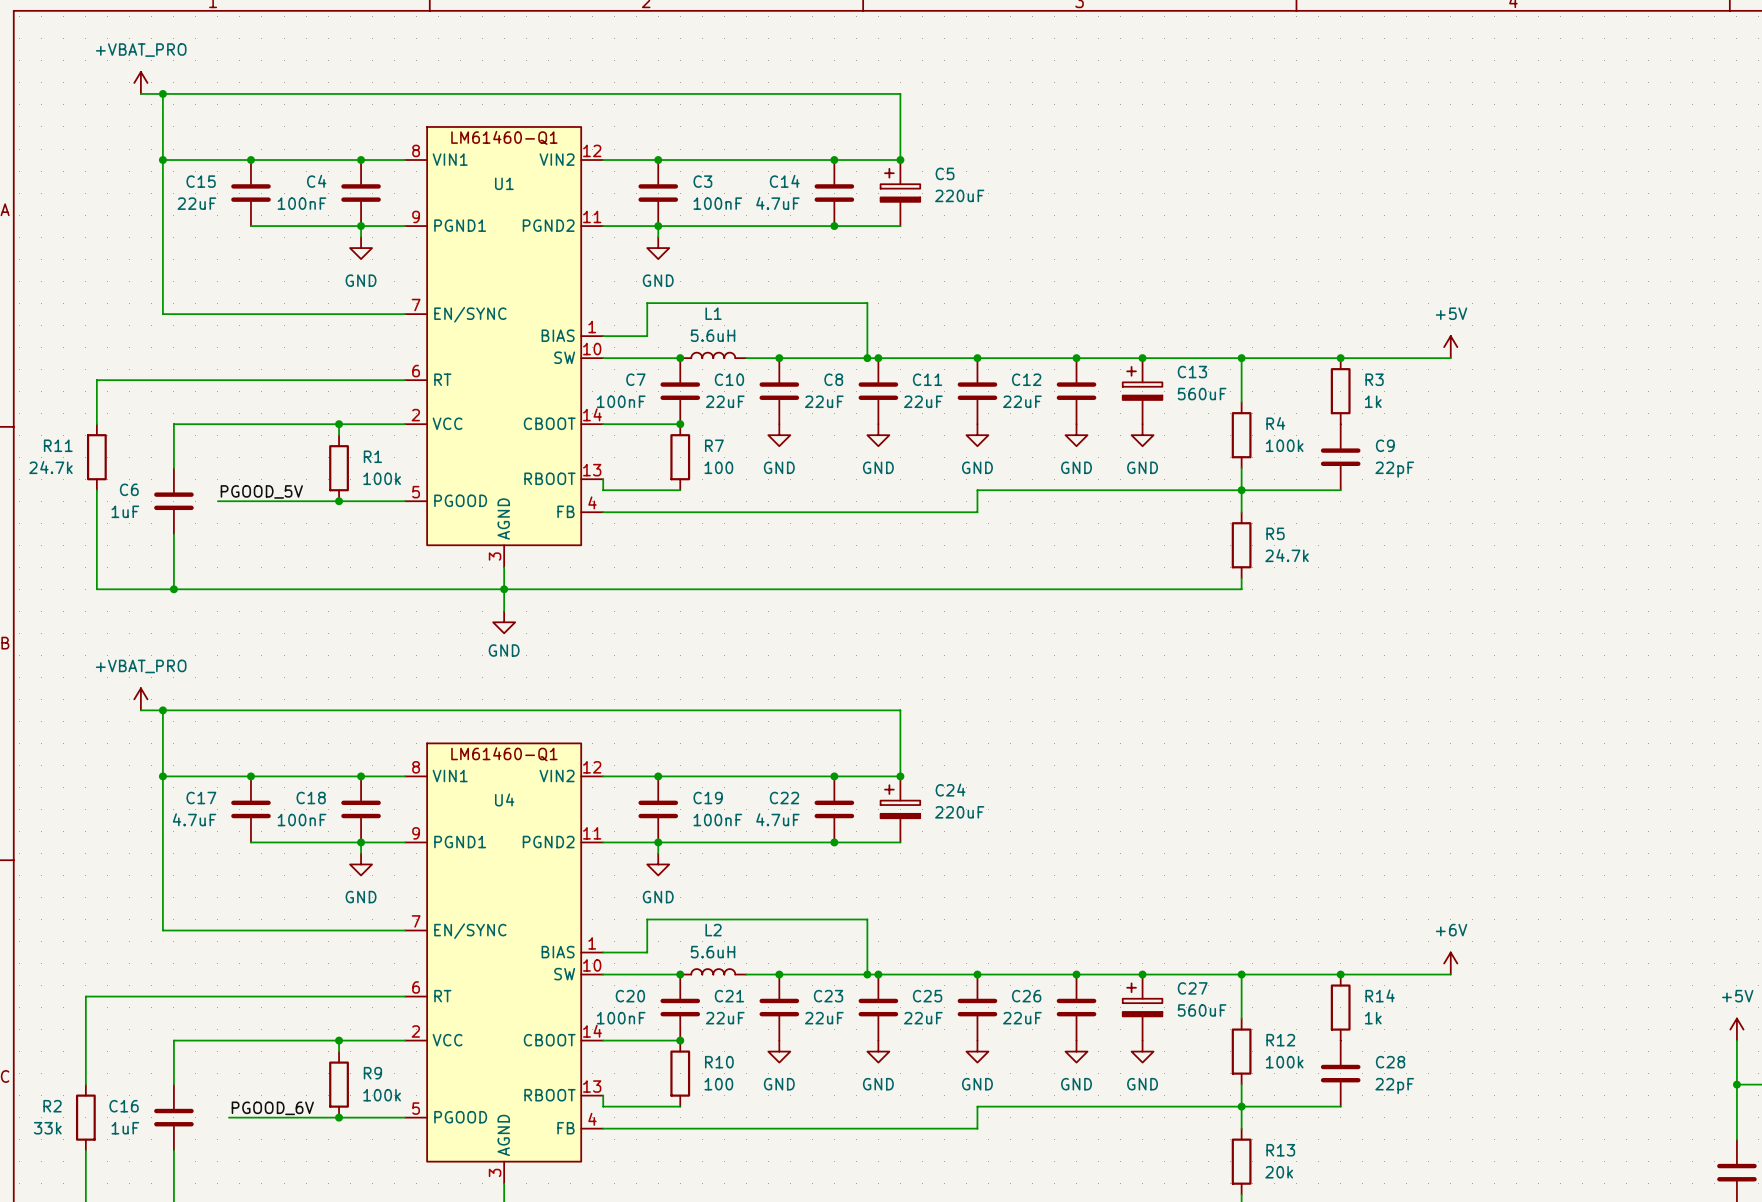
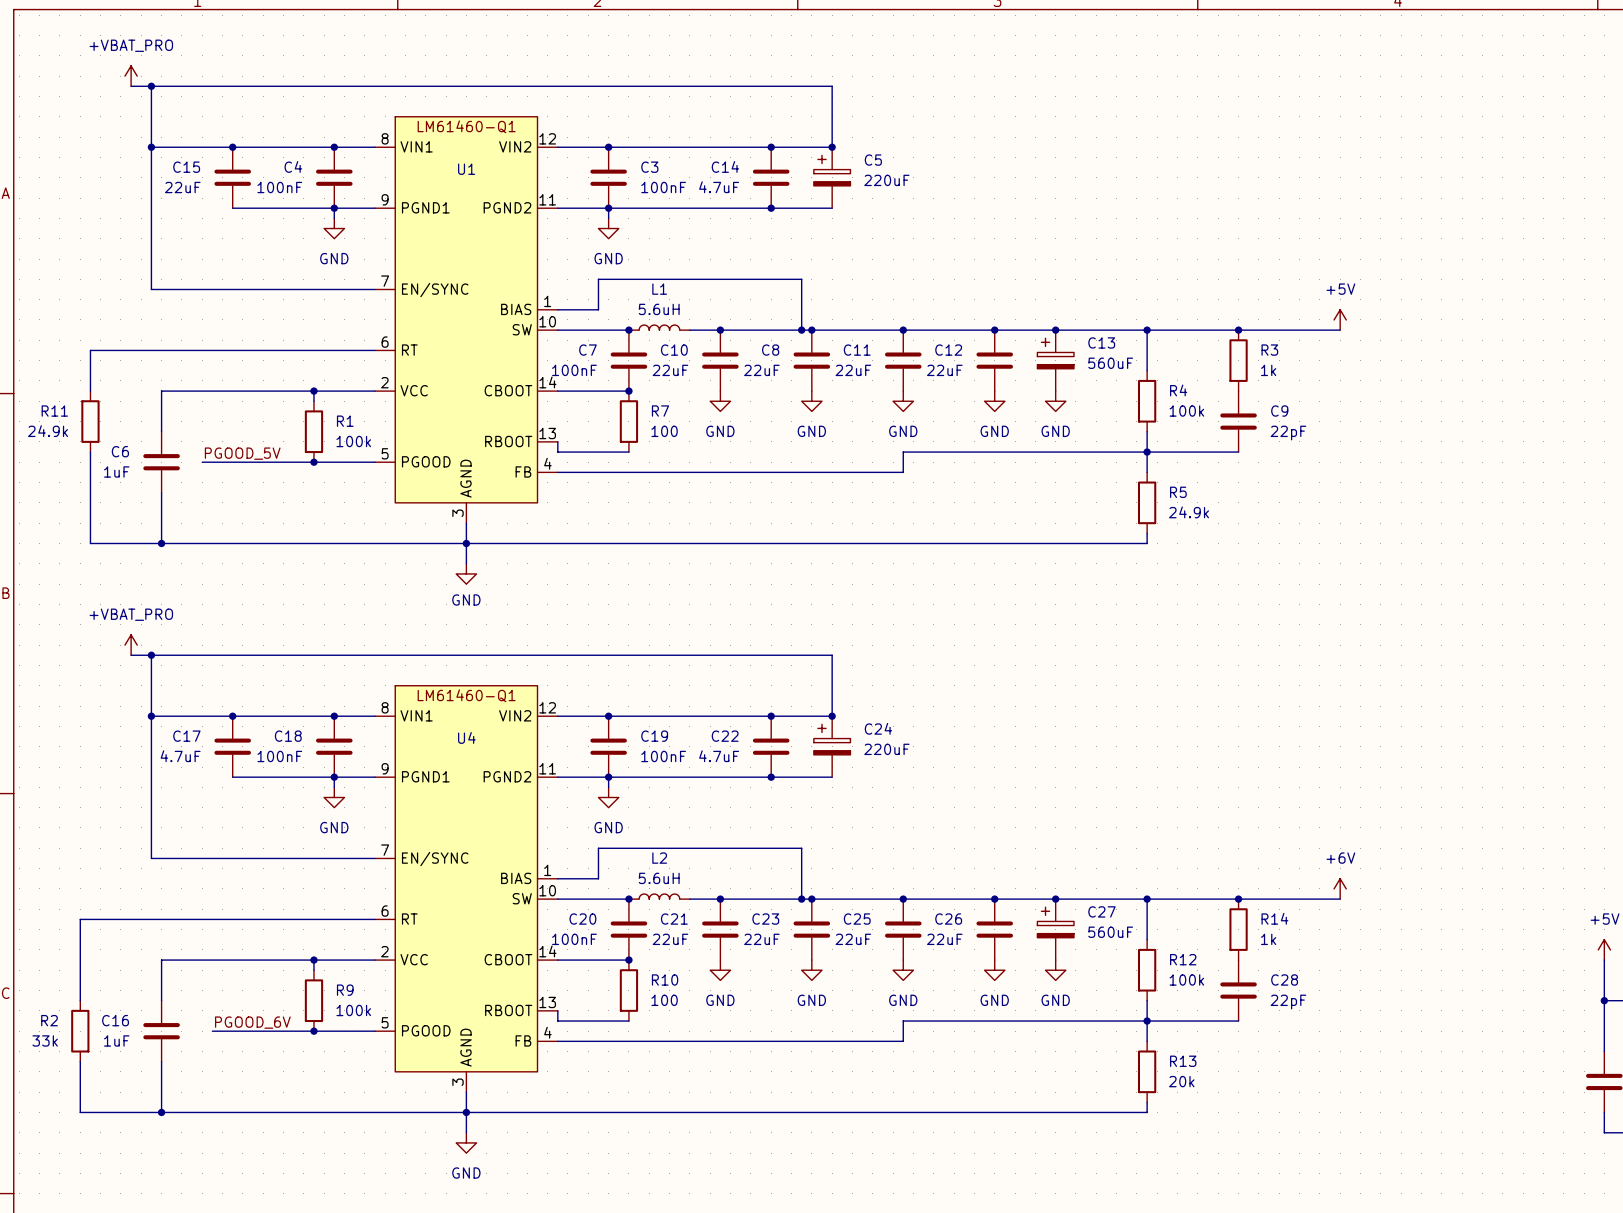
R11 value: 24.7k (50, 467) -> 24.9k (48, 431)
R5 value: 24.7k (1287, 555) -> 24.9k (1189, 512)

